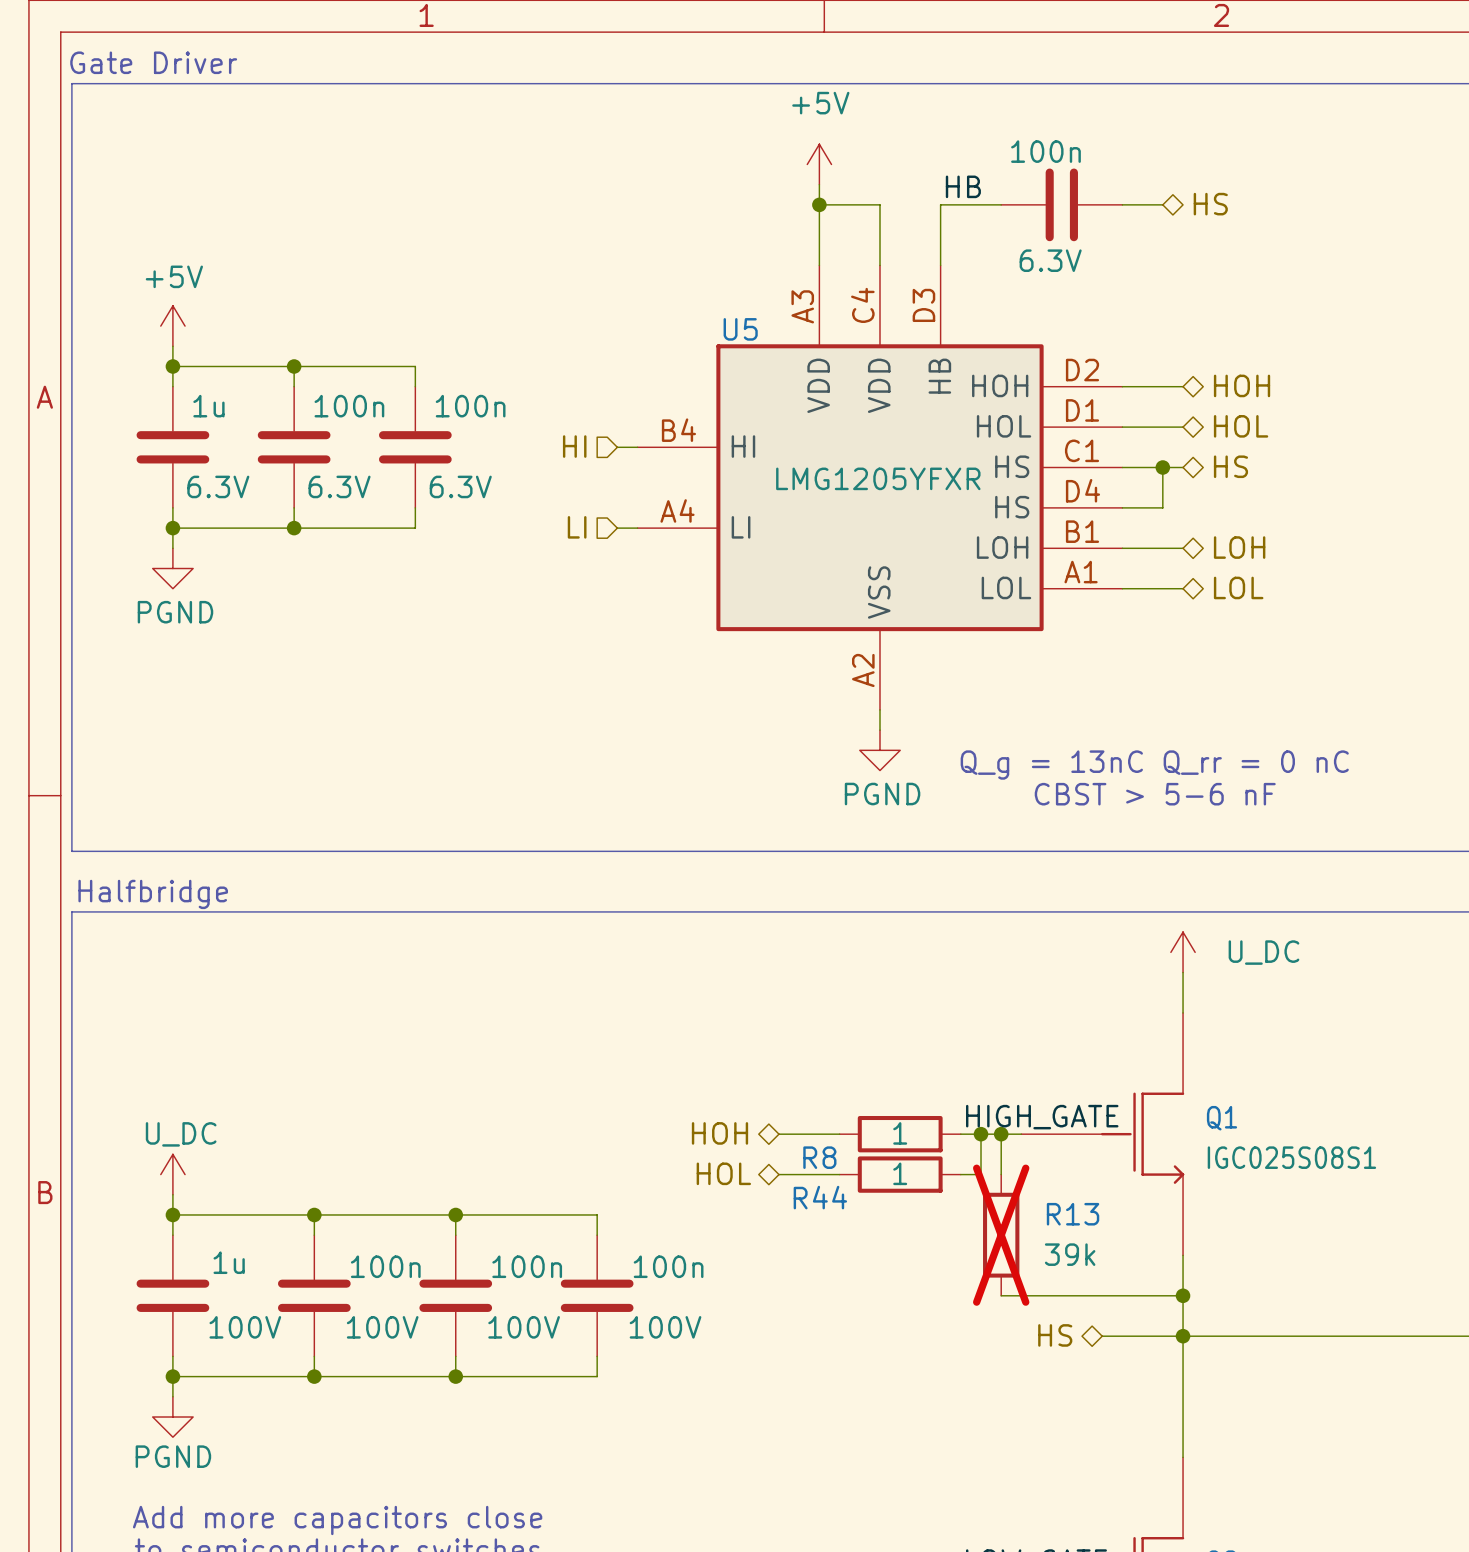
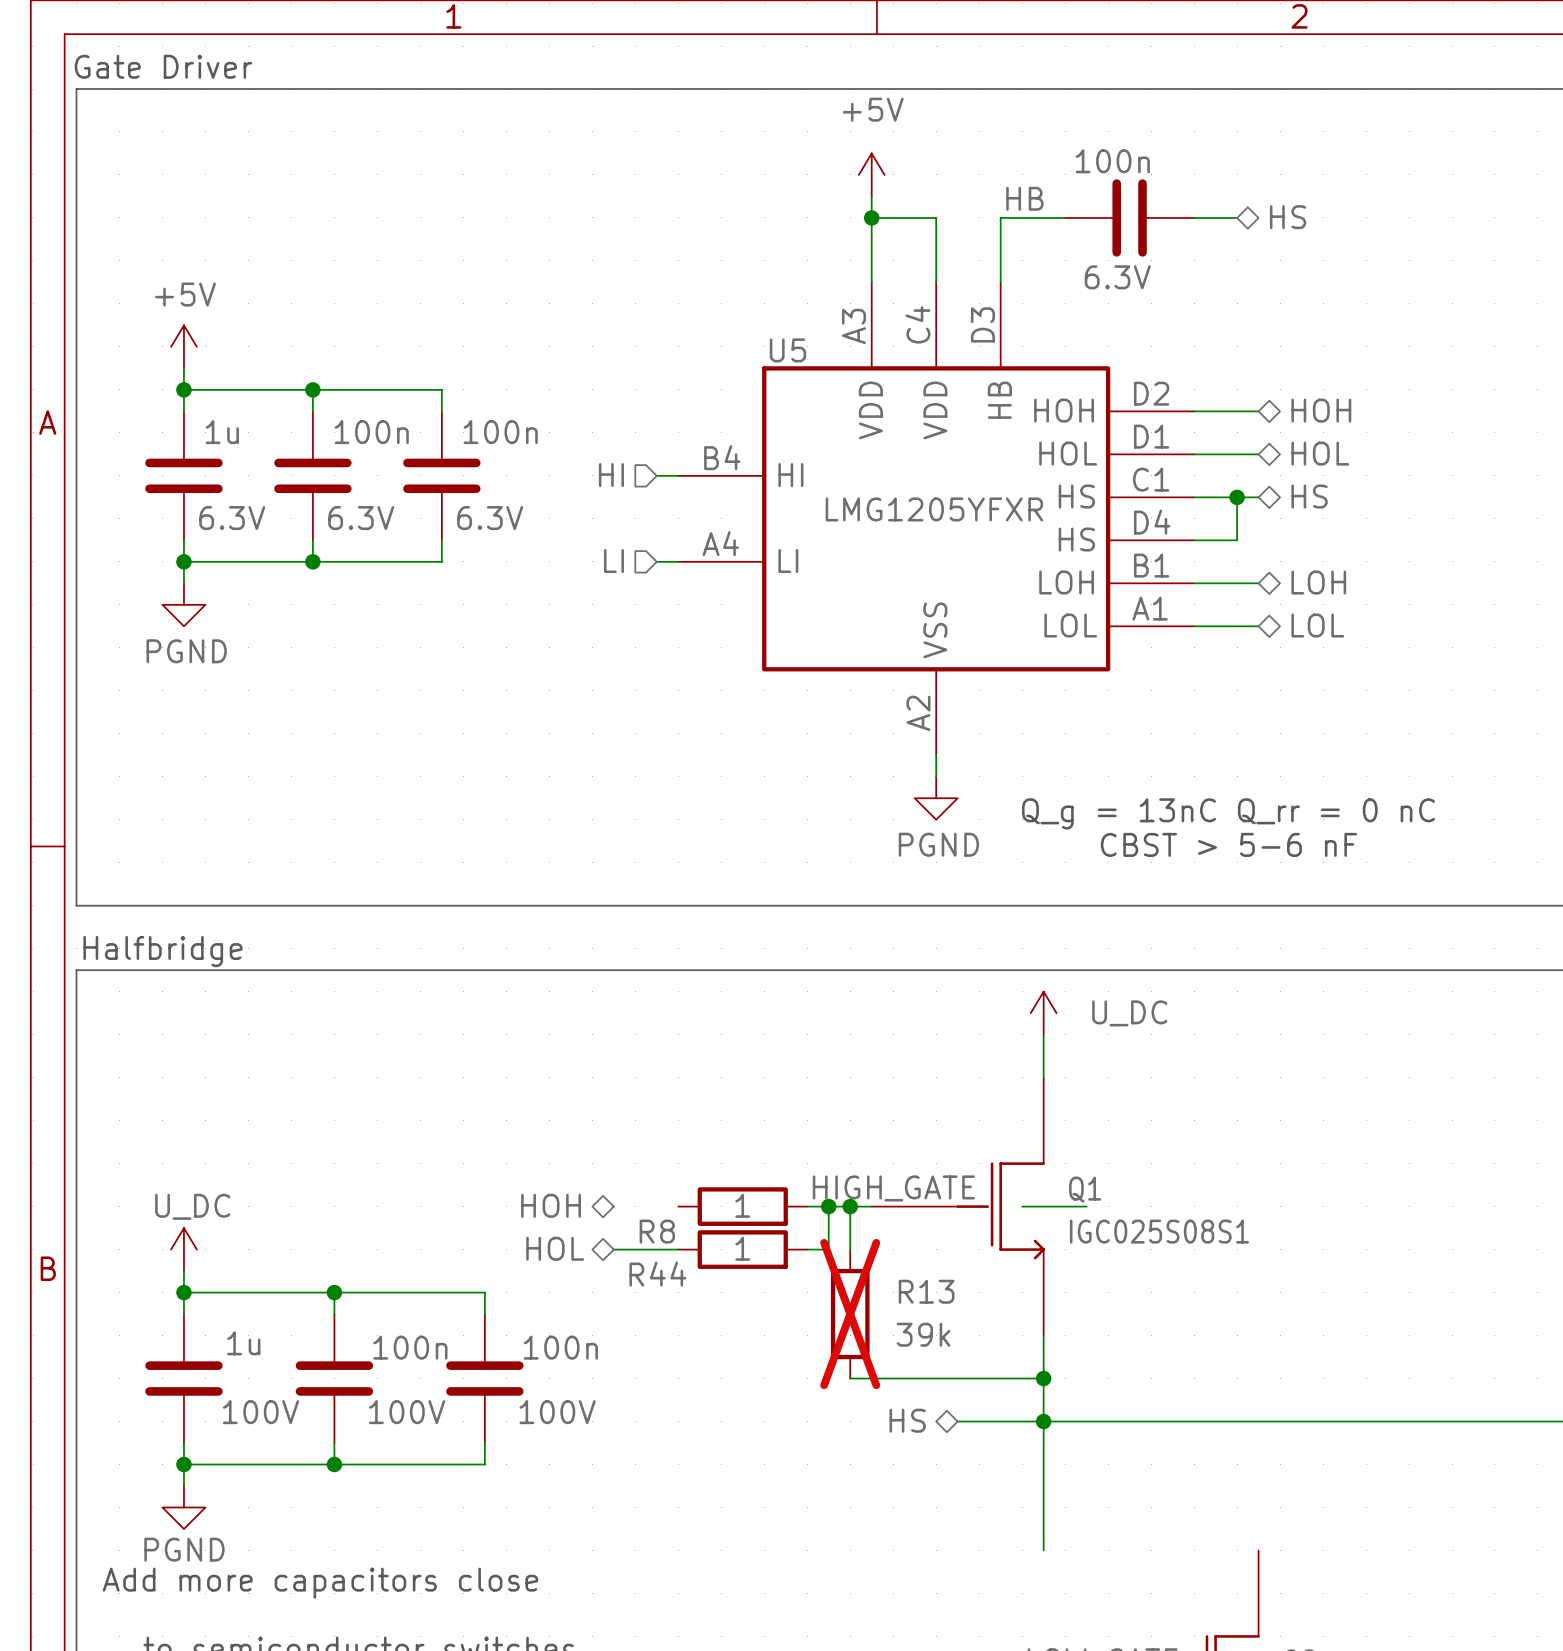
power symbol position: U_DC (1183, 952) -> U_DC (1043, 1013)
wire: (1183, 972) (1183, 1012) -> (1043, 1034) (1043, 1077)
label position: HIGH_GATE (1042, 1117) -> HIGH_GATE (893, 1188)
hierarchical label position: HOH (719, 1133) -> HOH (551, 1205)
wire: none -> (807, 1206) (828, 1206) (828, 1249) (807, 1249)
junction: none -> (828, 1206)
junction: none -> (850, 1206)
R8 position: (900, 1134) -> (742, 1206)
wire: (981, 1134) (981, 1174) (960, 1174) -> none
junction: (981, 1134) -> none
wire: (1001, 1134) (1001, 1174) -> (850, 1206) (850, 1249)
junction: (1001, 1134) -> none
Q1 position: (1102, 1134) -> (958, 1206)
hierarchical label position: HOL (723, 1173) -> HOL (555, 1248)
wire: (778, 1174) (839, 1174) -> (613, 1249) (678, 1249)
R44 position: (900, 1174) -> (742, 1249)
wire: (455, 1214) (597, 1214) (597, 1235) -> none
junction: (455, 1214) -> none
R13 position: (1001, 1235) -> (850, 1314)
wire: (1183, 1255) (1183, 1457) -> (1043, 1335) (1043, 1550)
part: 100n (597, 1295) -> none
junction: none -> (1043, 1378)
wire: (1001, 1295) (1183, 1295) -> (850, 1378) (1043, 1378)
junction: (1183, 1295) -> none
hierarchical label position: HS (1055, 1335) -> HS (907, 1420)
wire: none -> (957, 1421) (1172, 1421)
junction: none -> (1043, 1421)
junction: (1183, 1336) -> none
wire: (597, 1356) (597, 1376) (455, 1376) -> none
junction: (455, 1376) -> none
text position: Add more capacitors close (337, 1520) -> Add more capacitors close (320, 1583)

